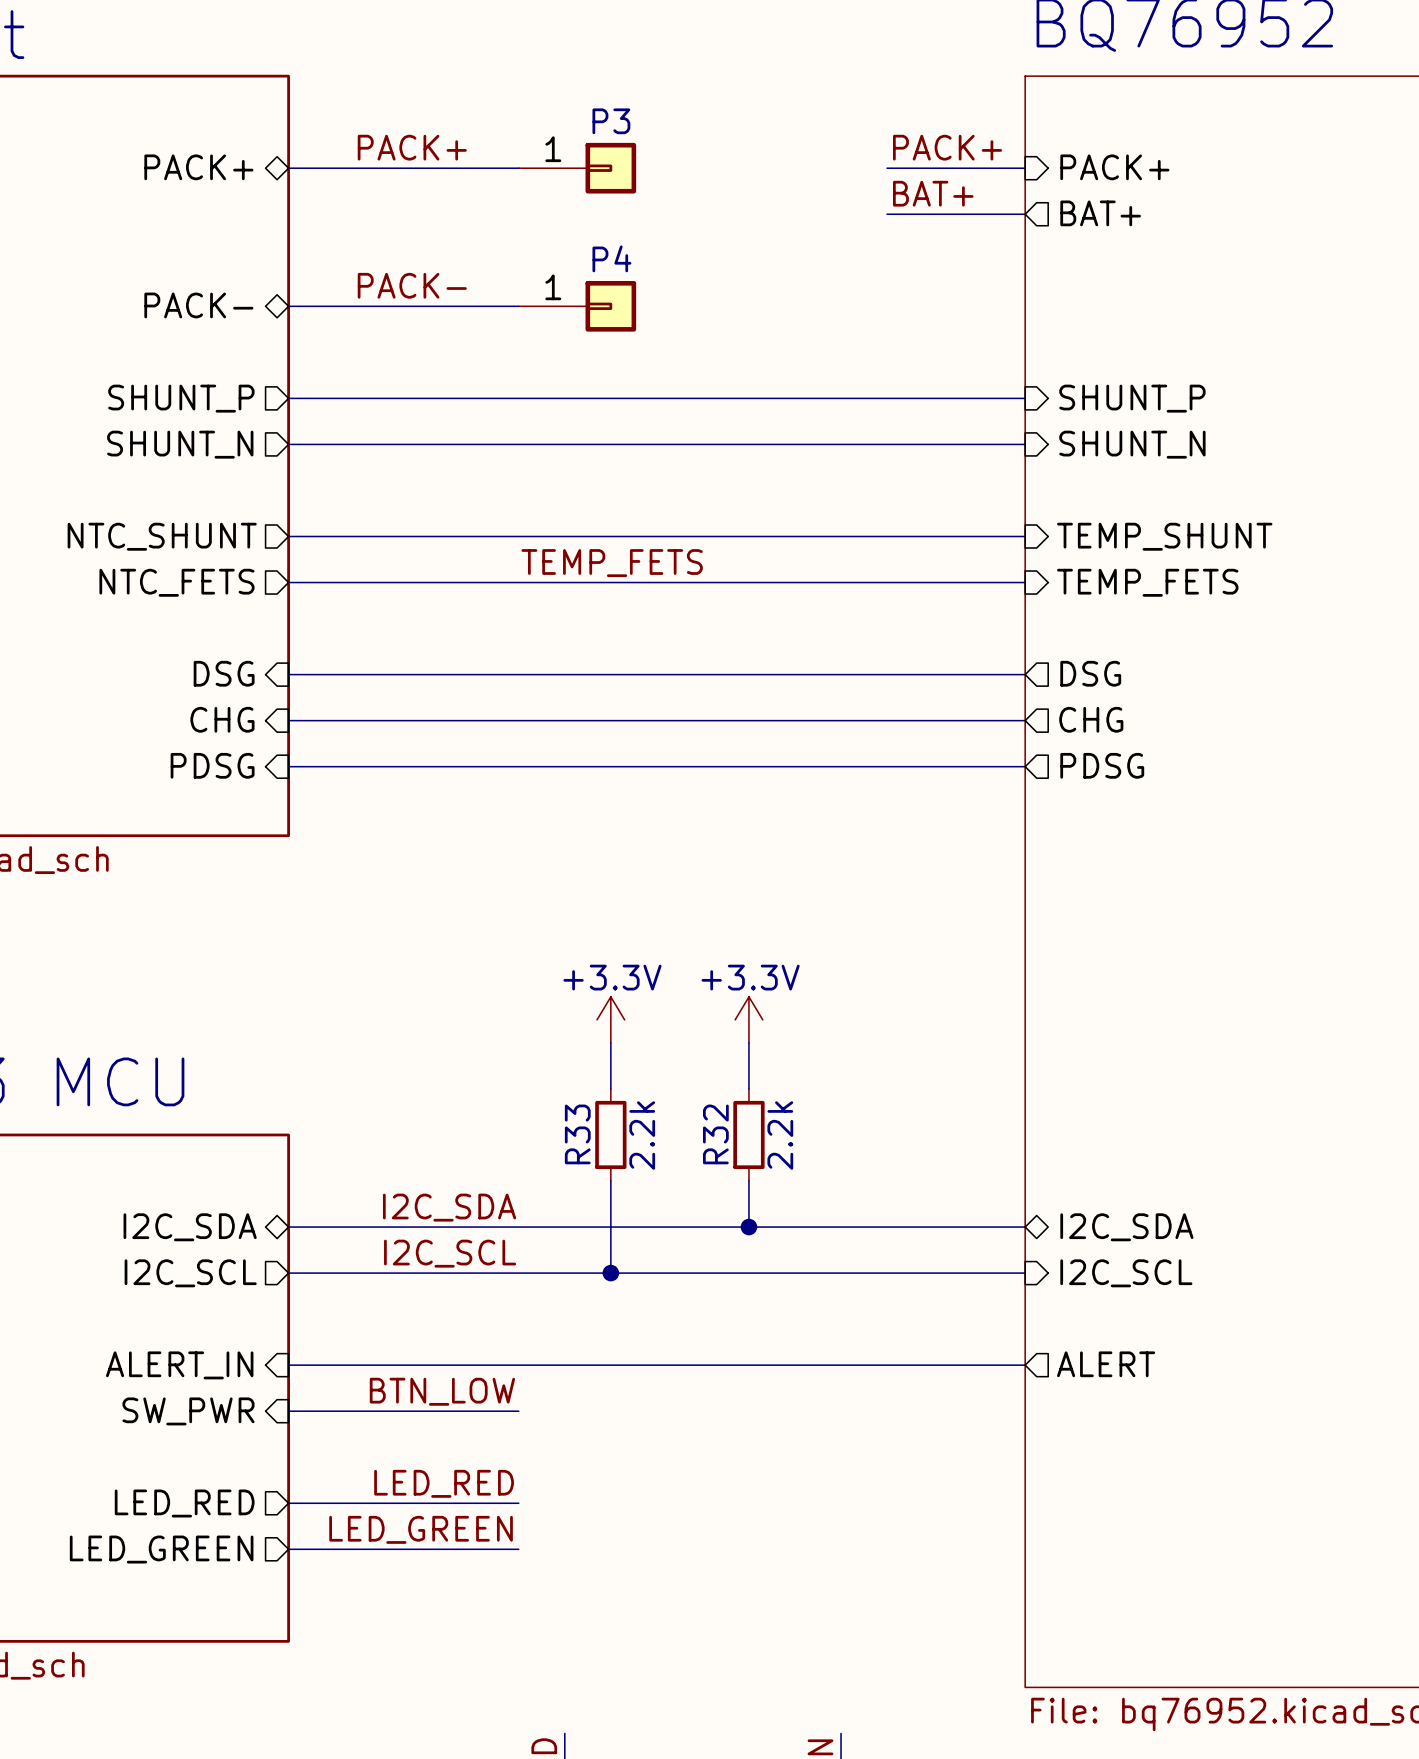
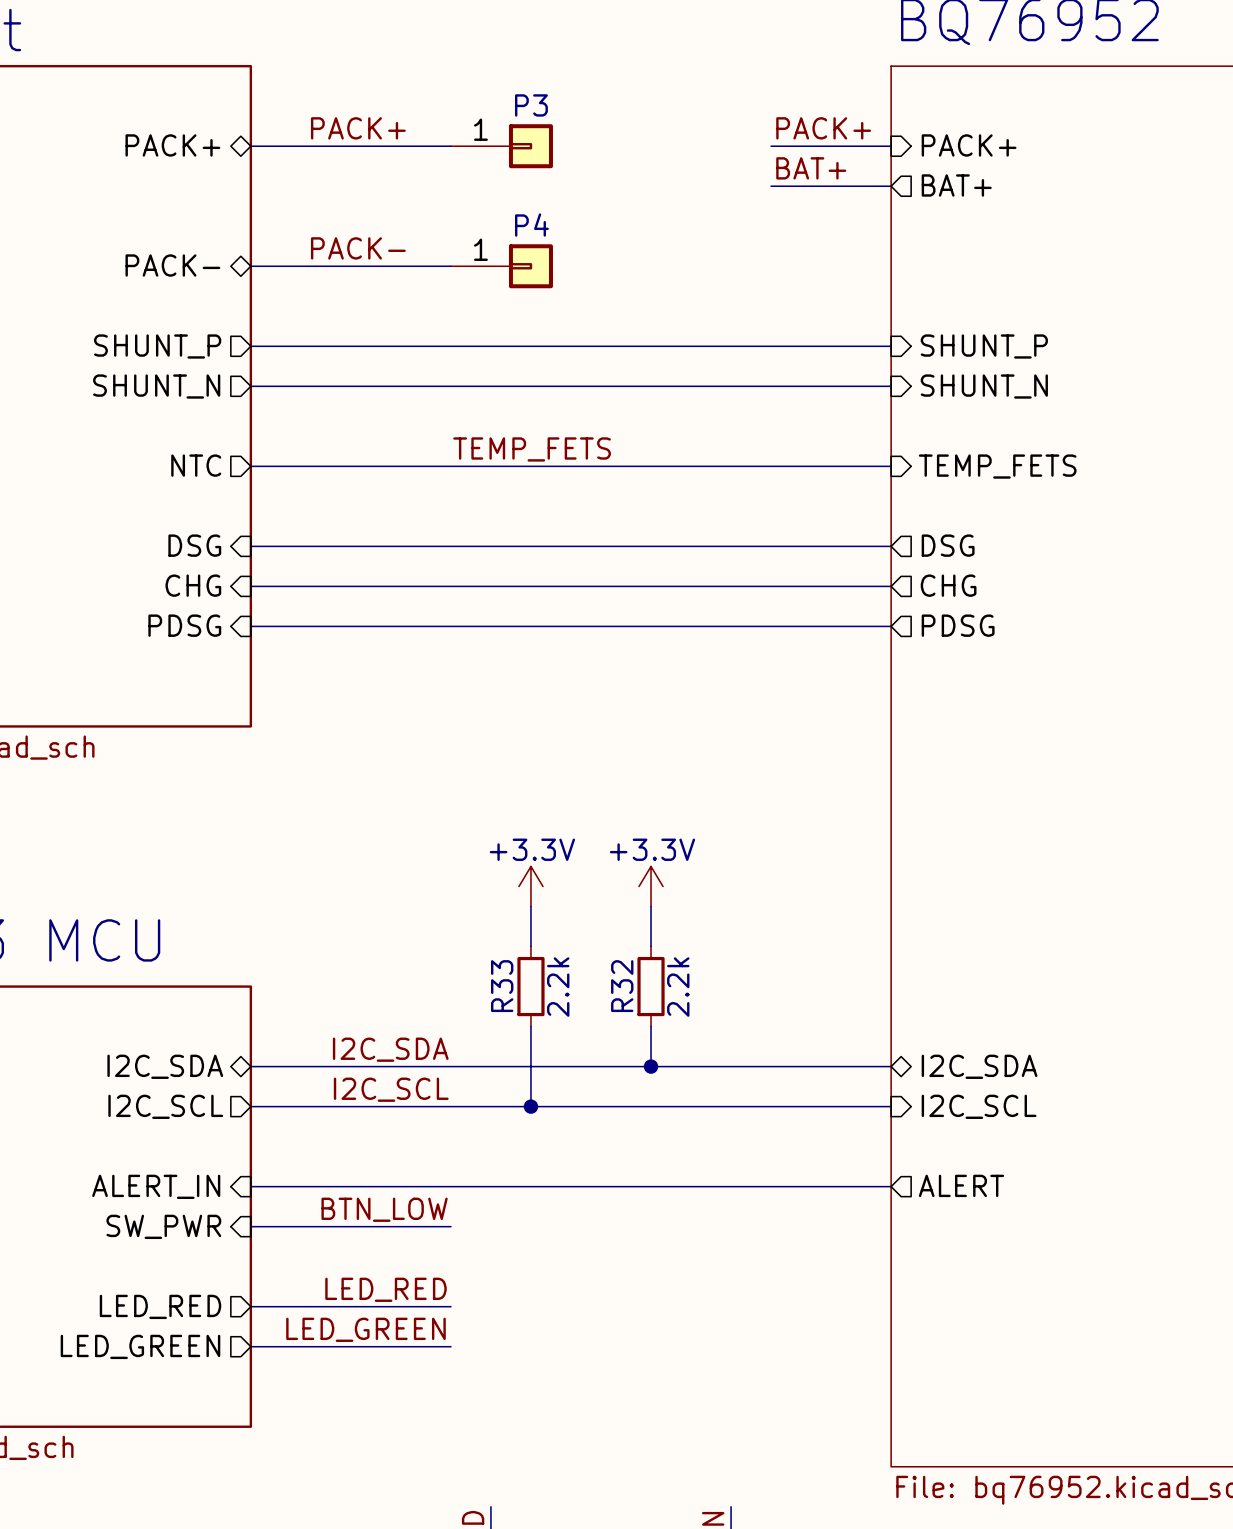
sheet pin: NTC_SHUNT (162, 536) -> NTC (196, 465)
sheet pin: TEMP_SHUNT (1164, 536) -> TEMP_FETS (997, 466)
label position: TEMP_FETS (612, 563) -> TEMP_FETS (532, 449)
sheet pin: NTC_FETS (176, 582) -> none
wire: (288, 582) (1025, 582) -> (250, 546) (891, 546)
sheet pin: TEMP_FETS (1147, 582) -> none
sheet pin: none -> DSG (194, 545)
sheet pin: none -> DSG (948, 545)
sheet pin: DSG (224, 673) -> CHG (193, 585)
sheet pin: DSG (1090, 673) -> CHG (948, 585)
sheet pin: CHG (222, 719) -> PDSG (184, 625)
sheet pin: CHG (1091, 719) -> PDSG (958, 625)
sheet pin: PDSG (212, 765) -> none
sheet pin: PDSG (1102, 765) -> none
wire: (288, 766) (1025, 766) -> none

